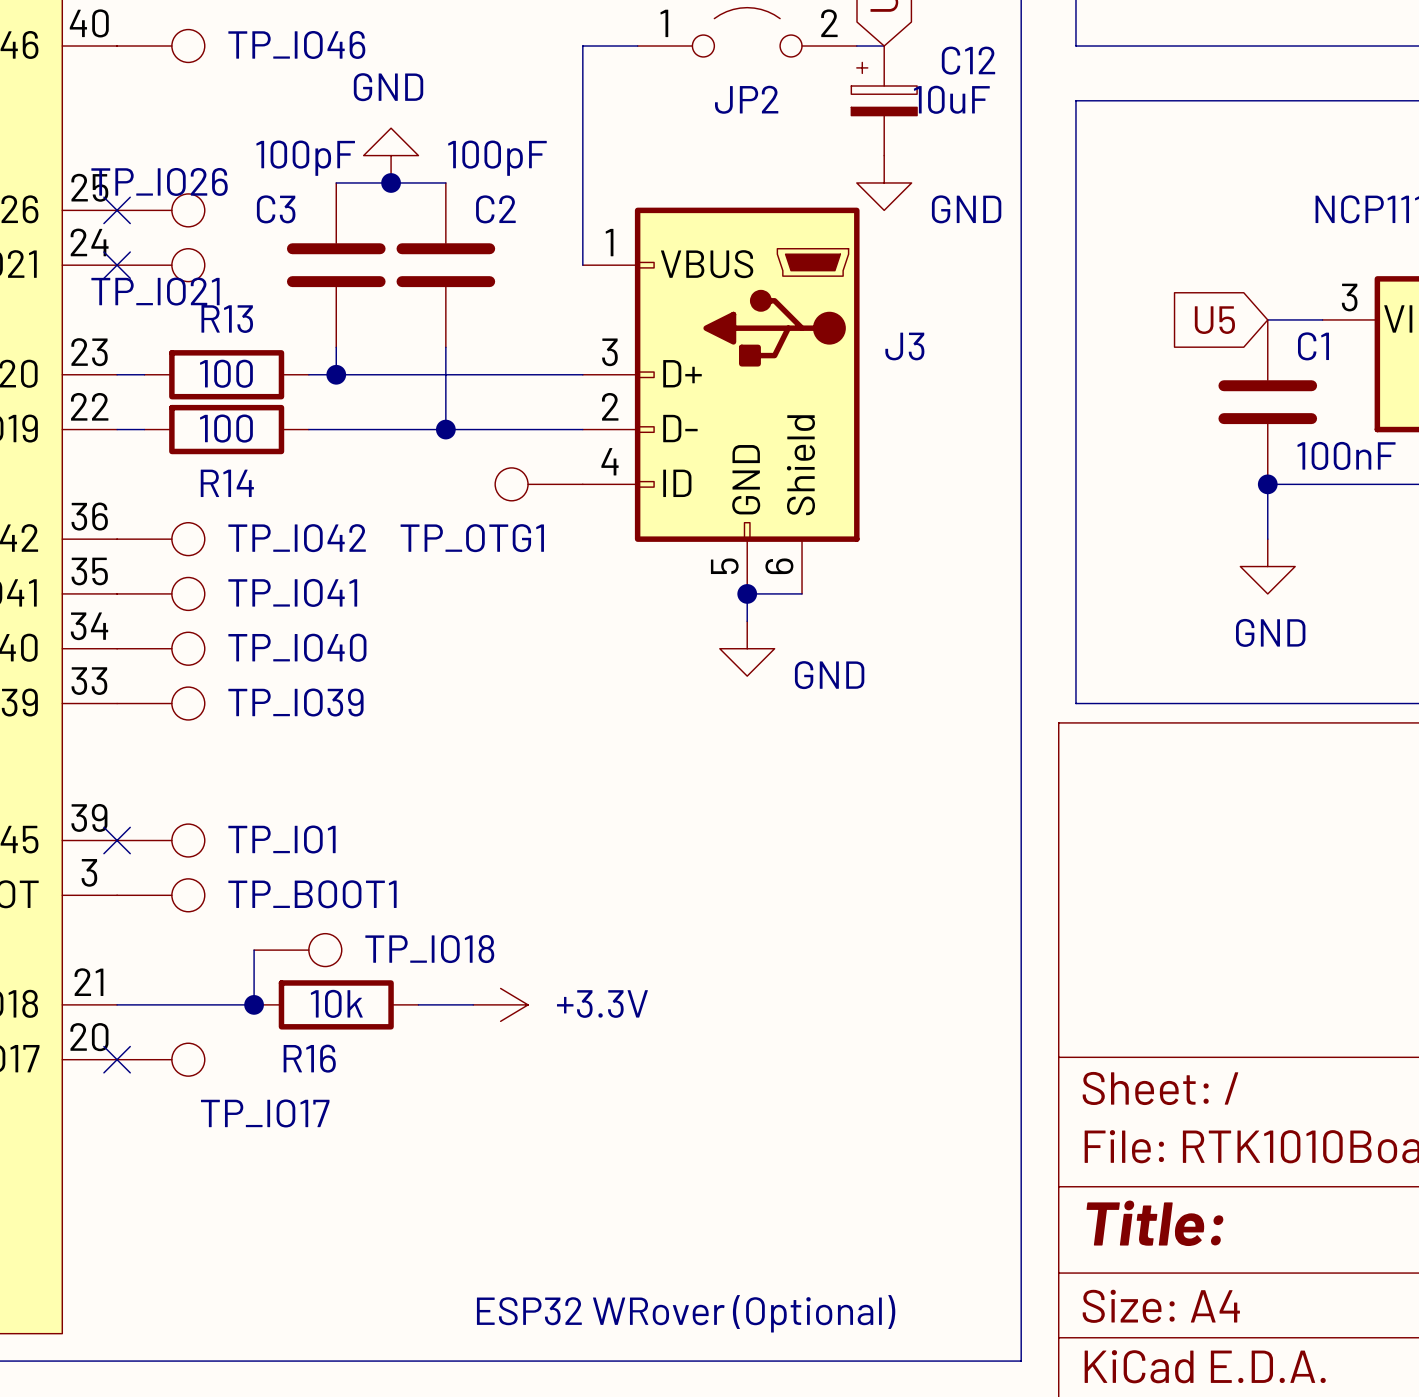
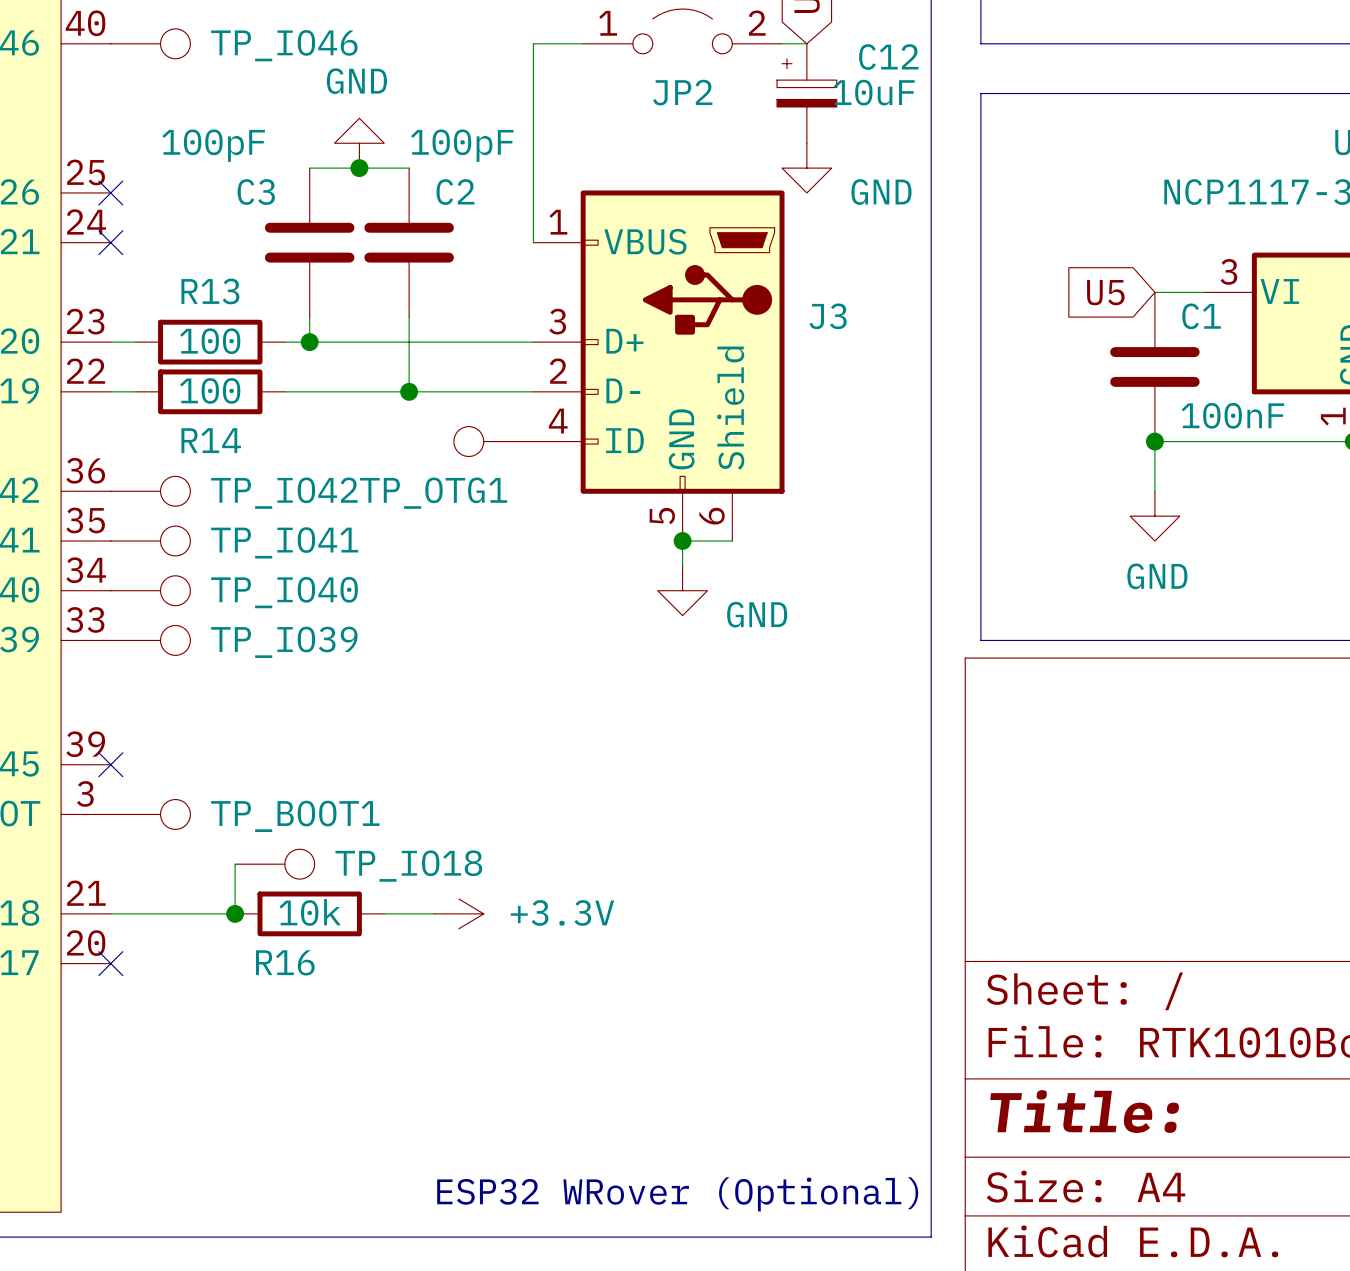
C3 value position: 100pF (305, 158) -> 100pF (213, 145)
TP_IO26: (160, 210) -> none
TP_IO21: (160, 265) -> none
TP_IO1: (160, 840) -> none
TP_IO17: (160, 1059) -> none

